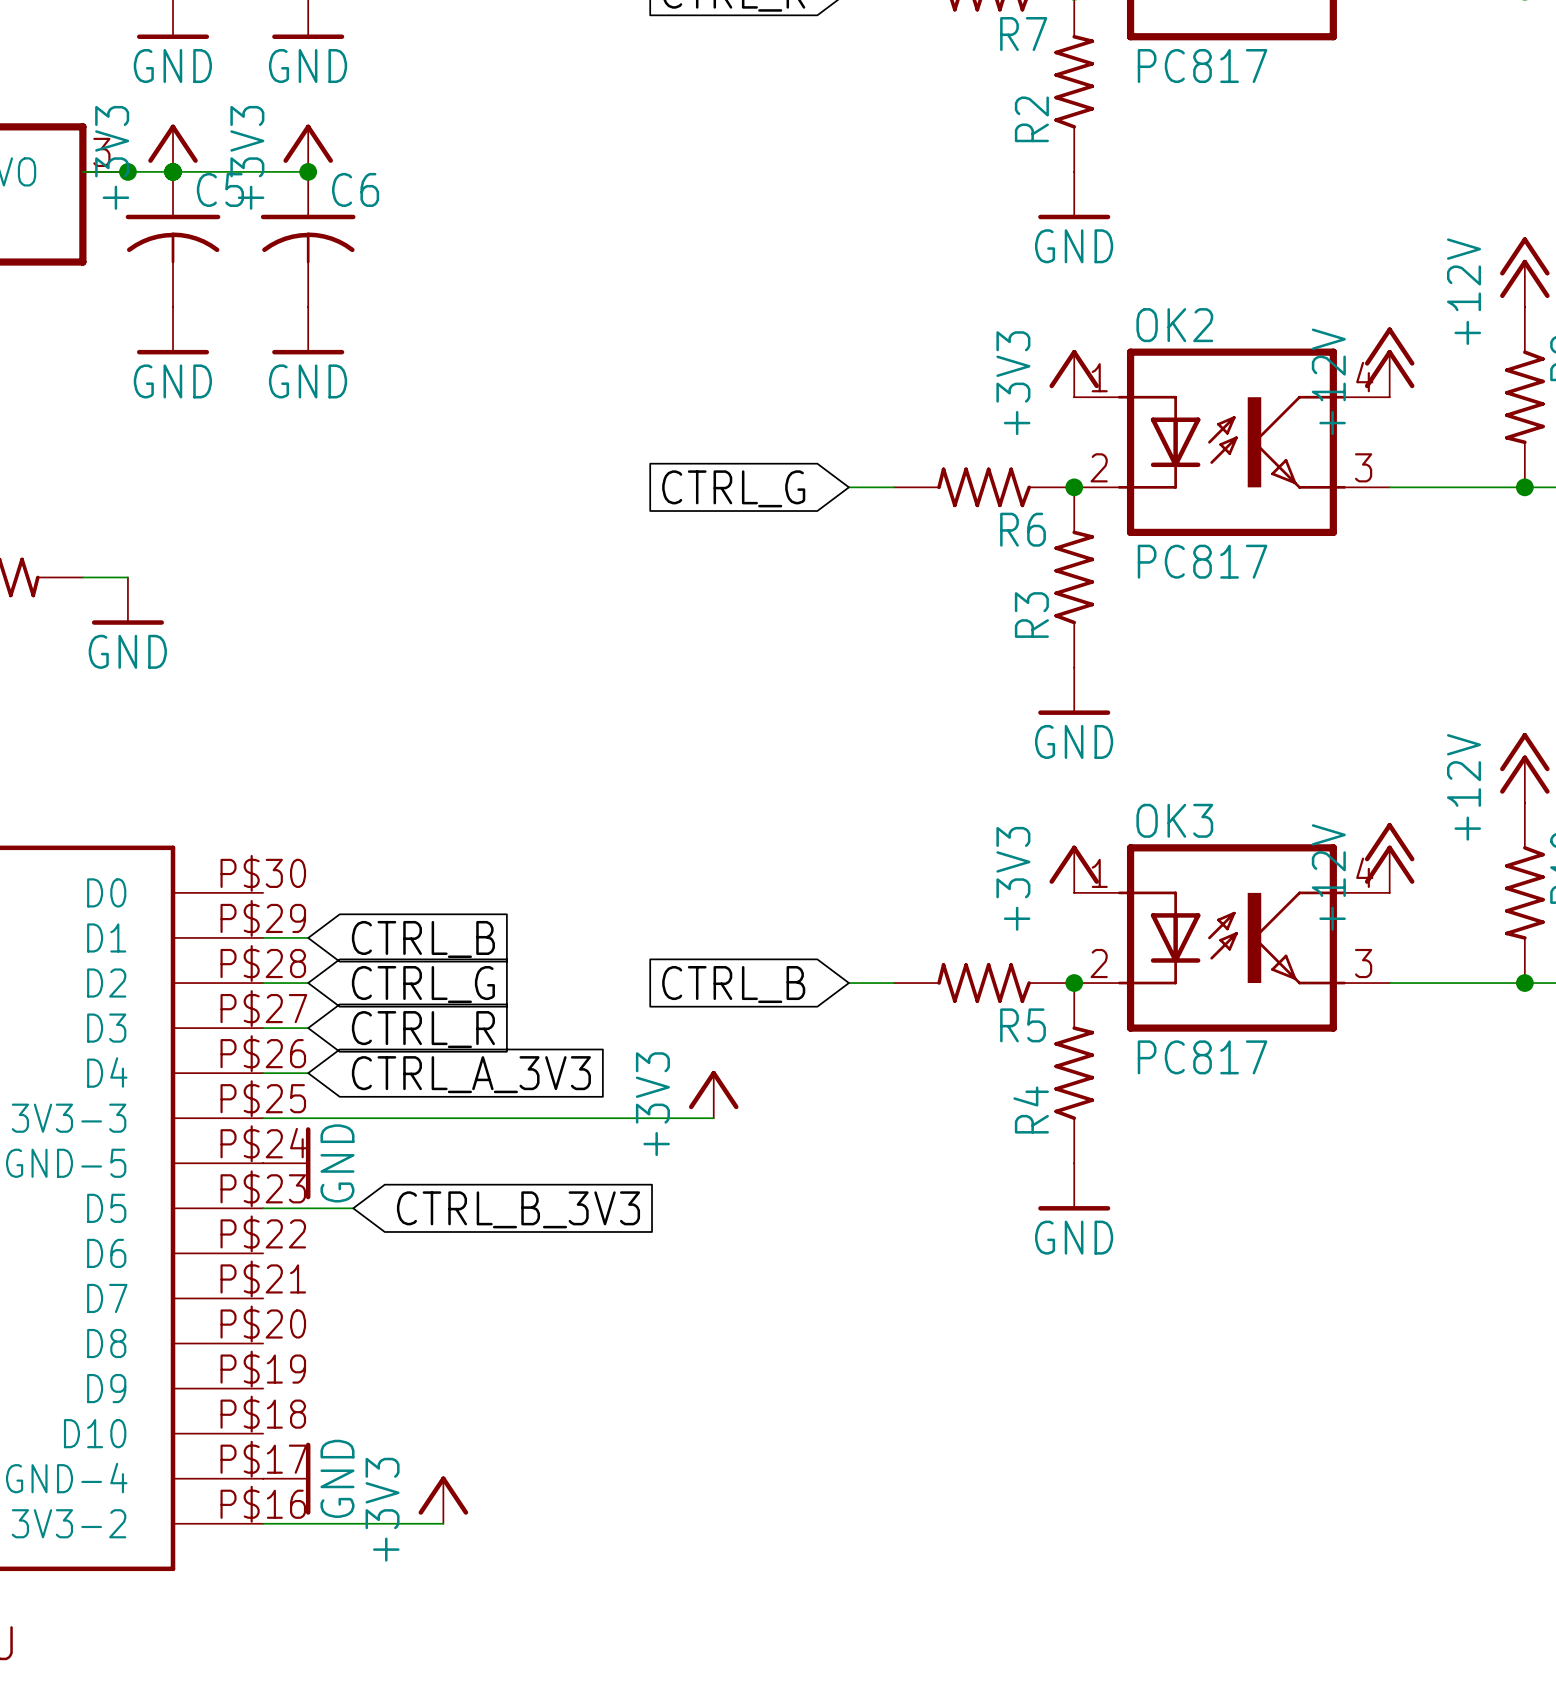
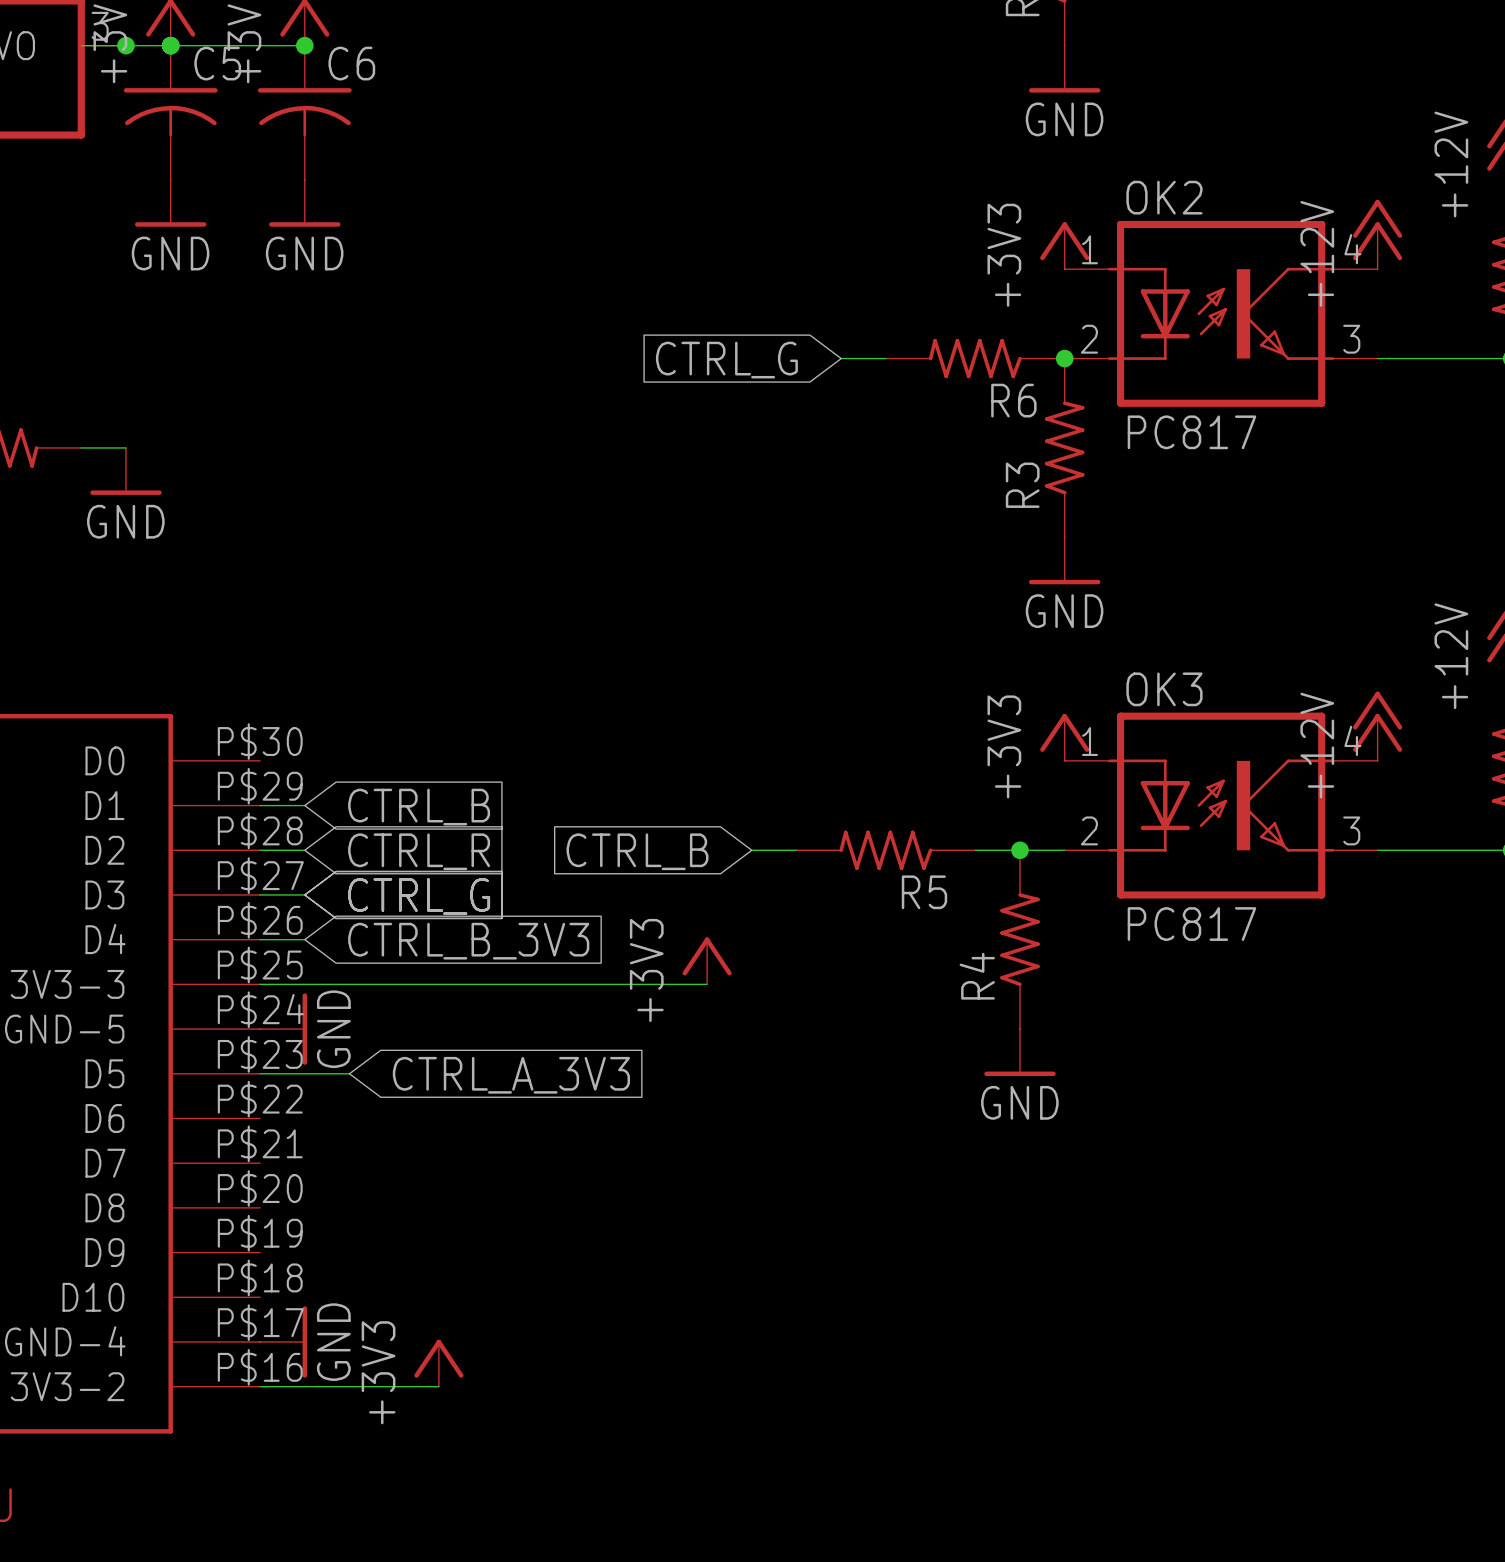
wire: (848, 983) (893, 983) -> (751, 850) (796, 850)
R5 position: (984, 983) -> (885, 850)
junction position: (1074, 983) -> (1020, 850)
global label: CTRL_G (423, 984) -> CTRL_R (419, 851)
global label position: CTRL_B (733, 984) -> CTRL_B (637, 851)
global label: CTRL_R (423, 1029) -> CTRL_G (419, 896)
R4 position: (1074, 1073) -> (1020, 939)
global label: CTRL_A_3V3 (471, 1074) -> CTRL_B_3V3 (468, 941)
power symbol position: GND (1074, 1186) -> GND (1020, 1052)
global label: CTRL_B_3V3 (518, 1209) -> CTRL_A_3V3 (511, 1075)

